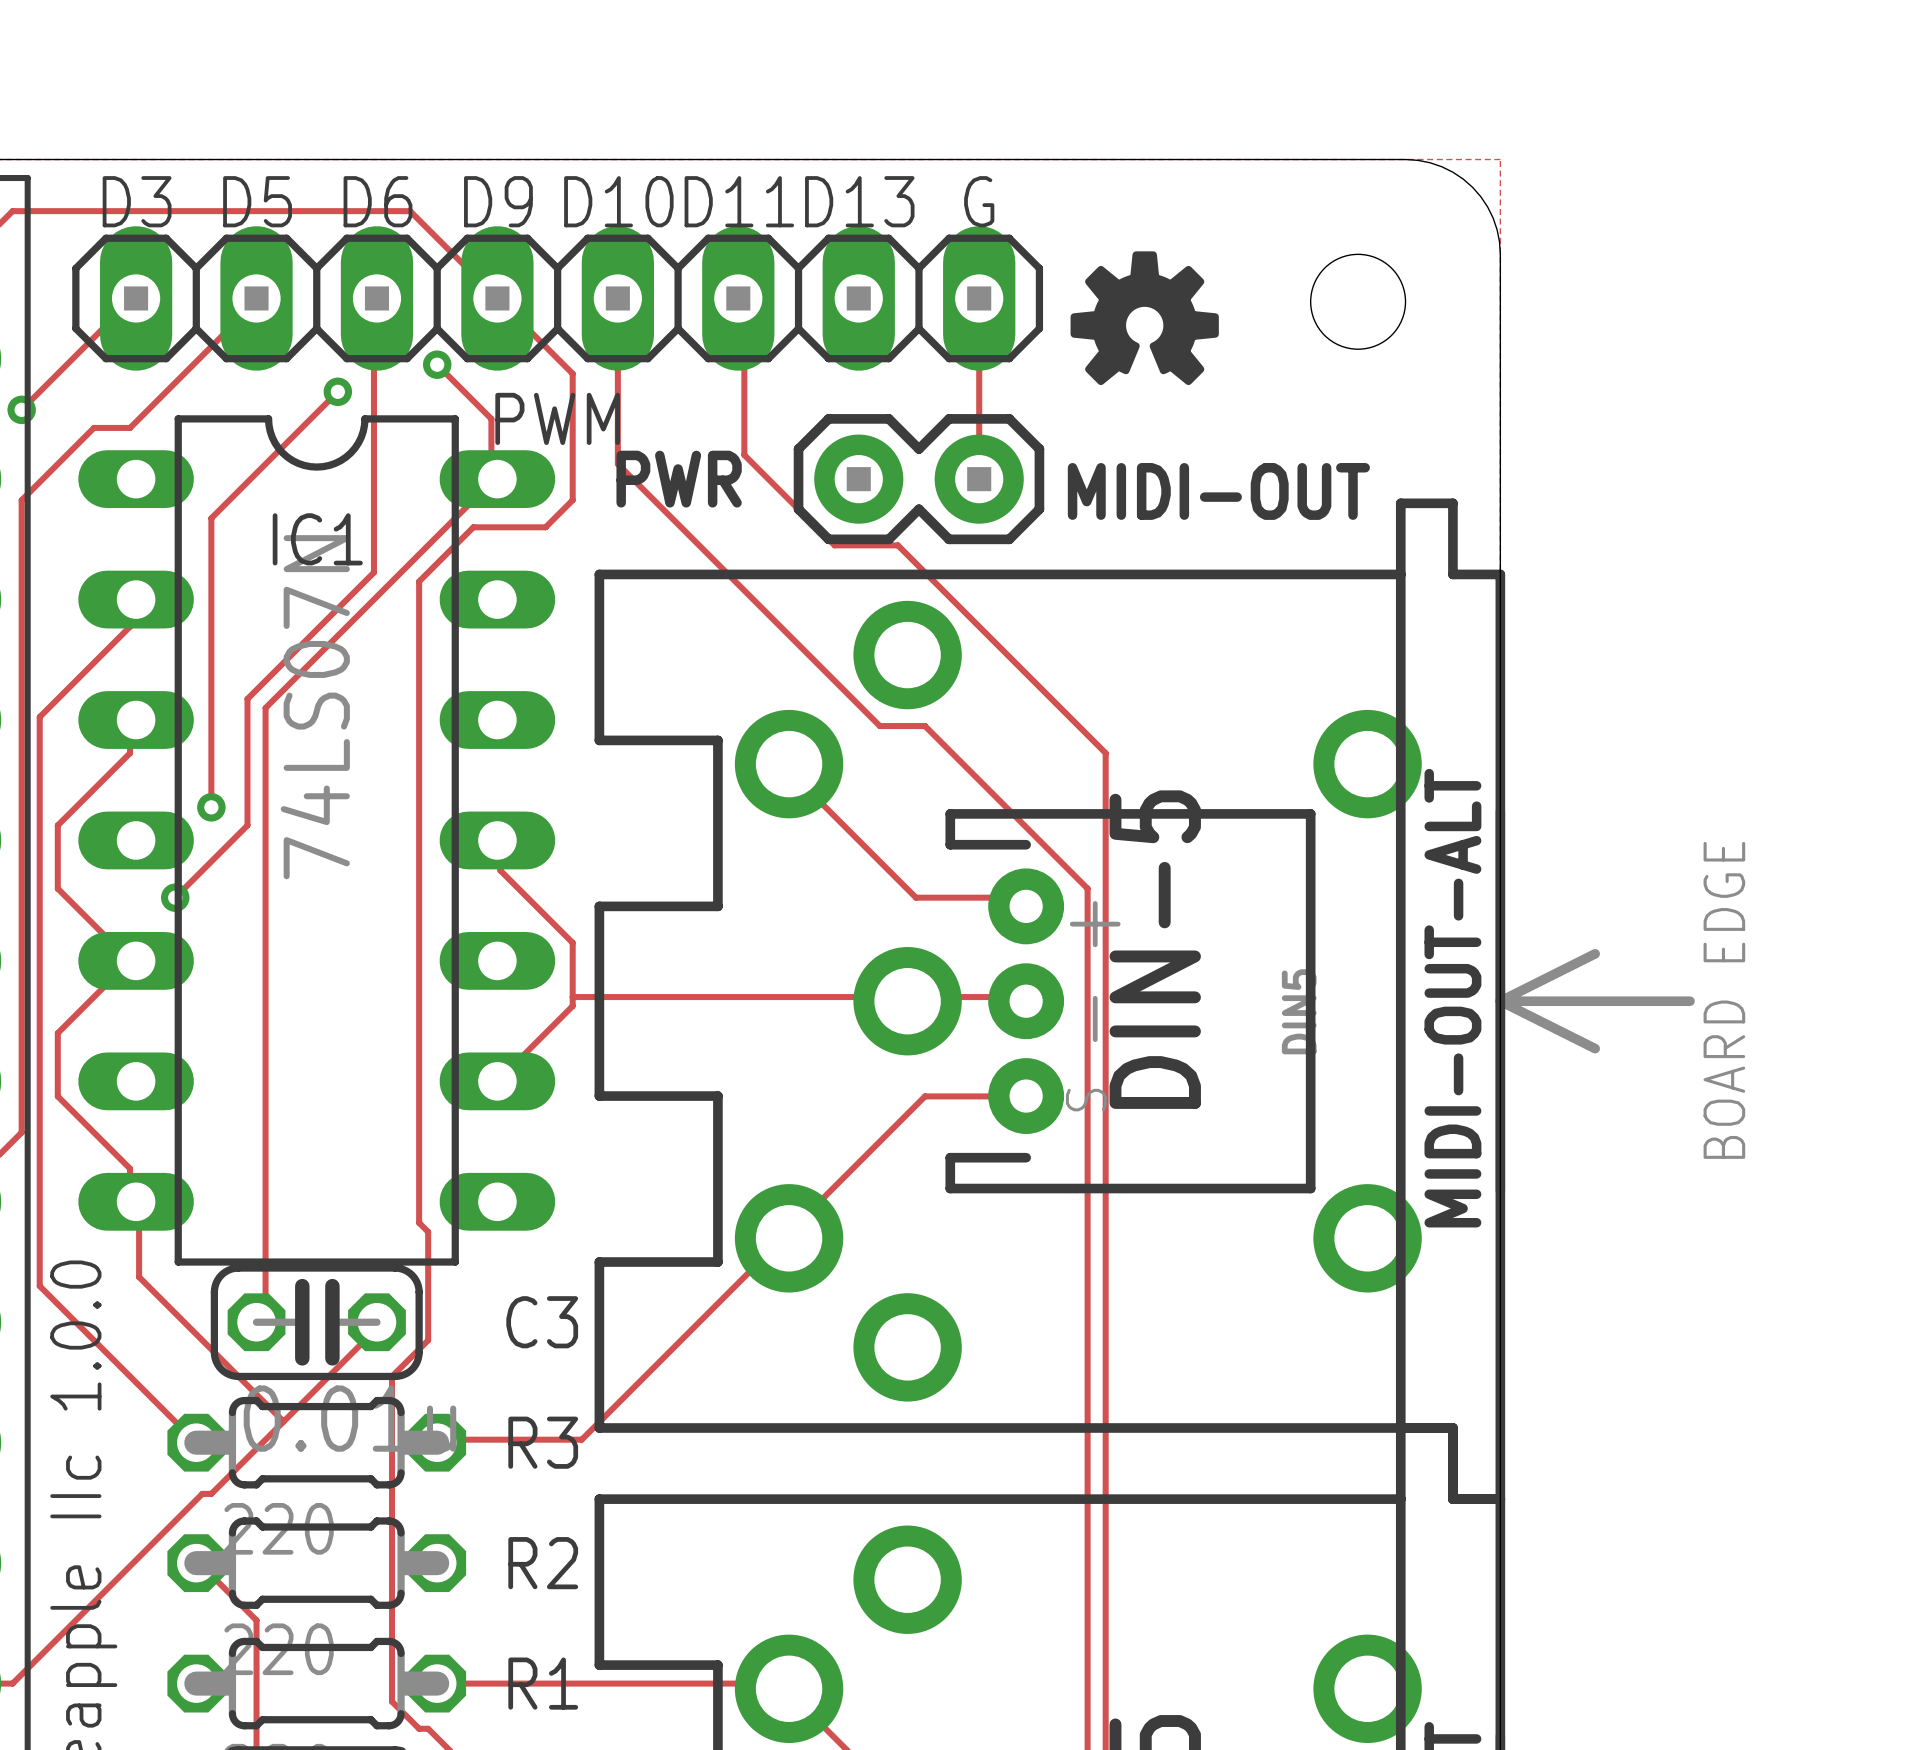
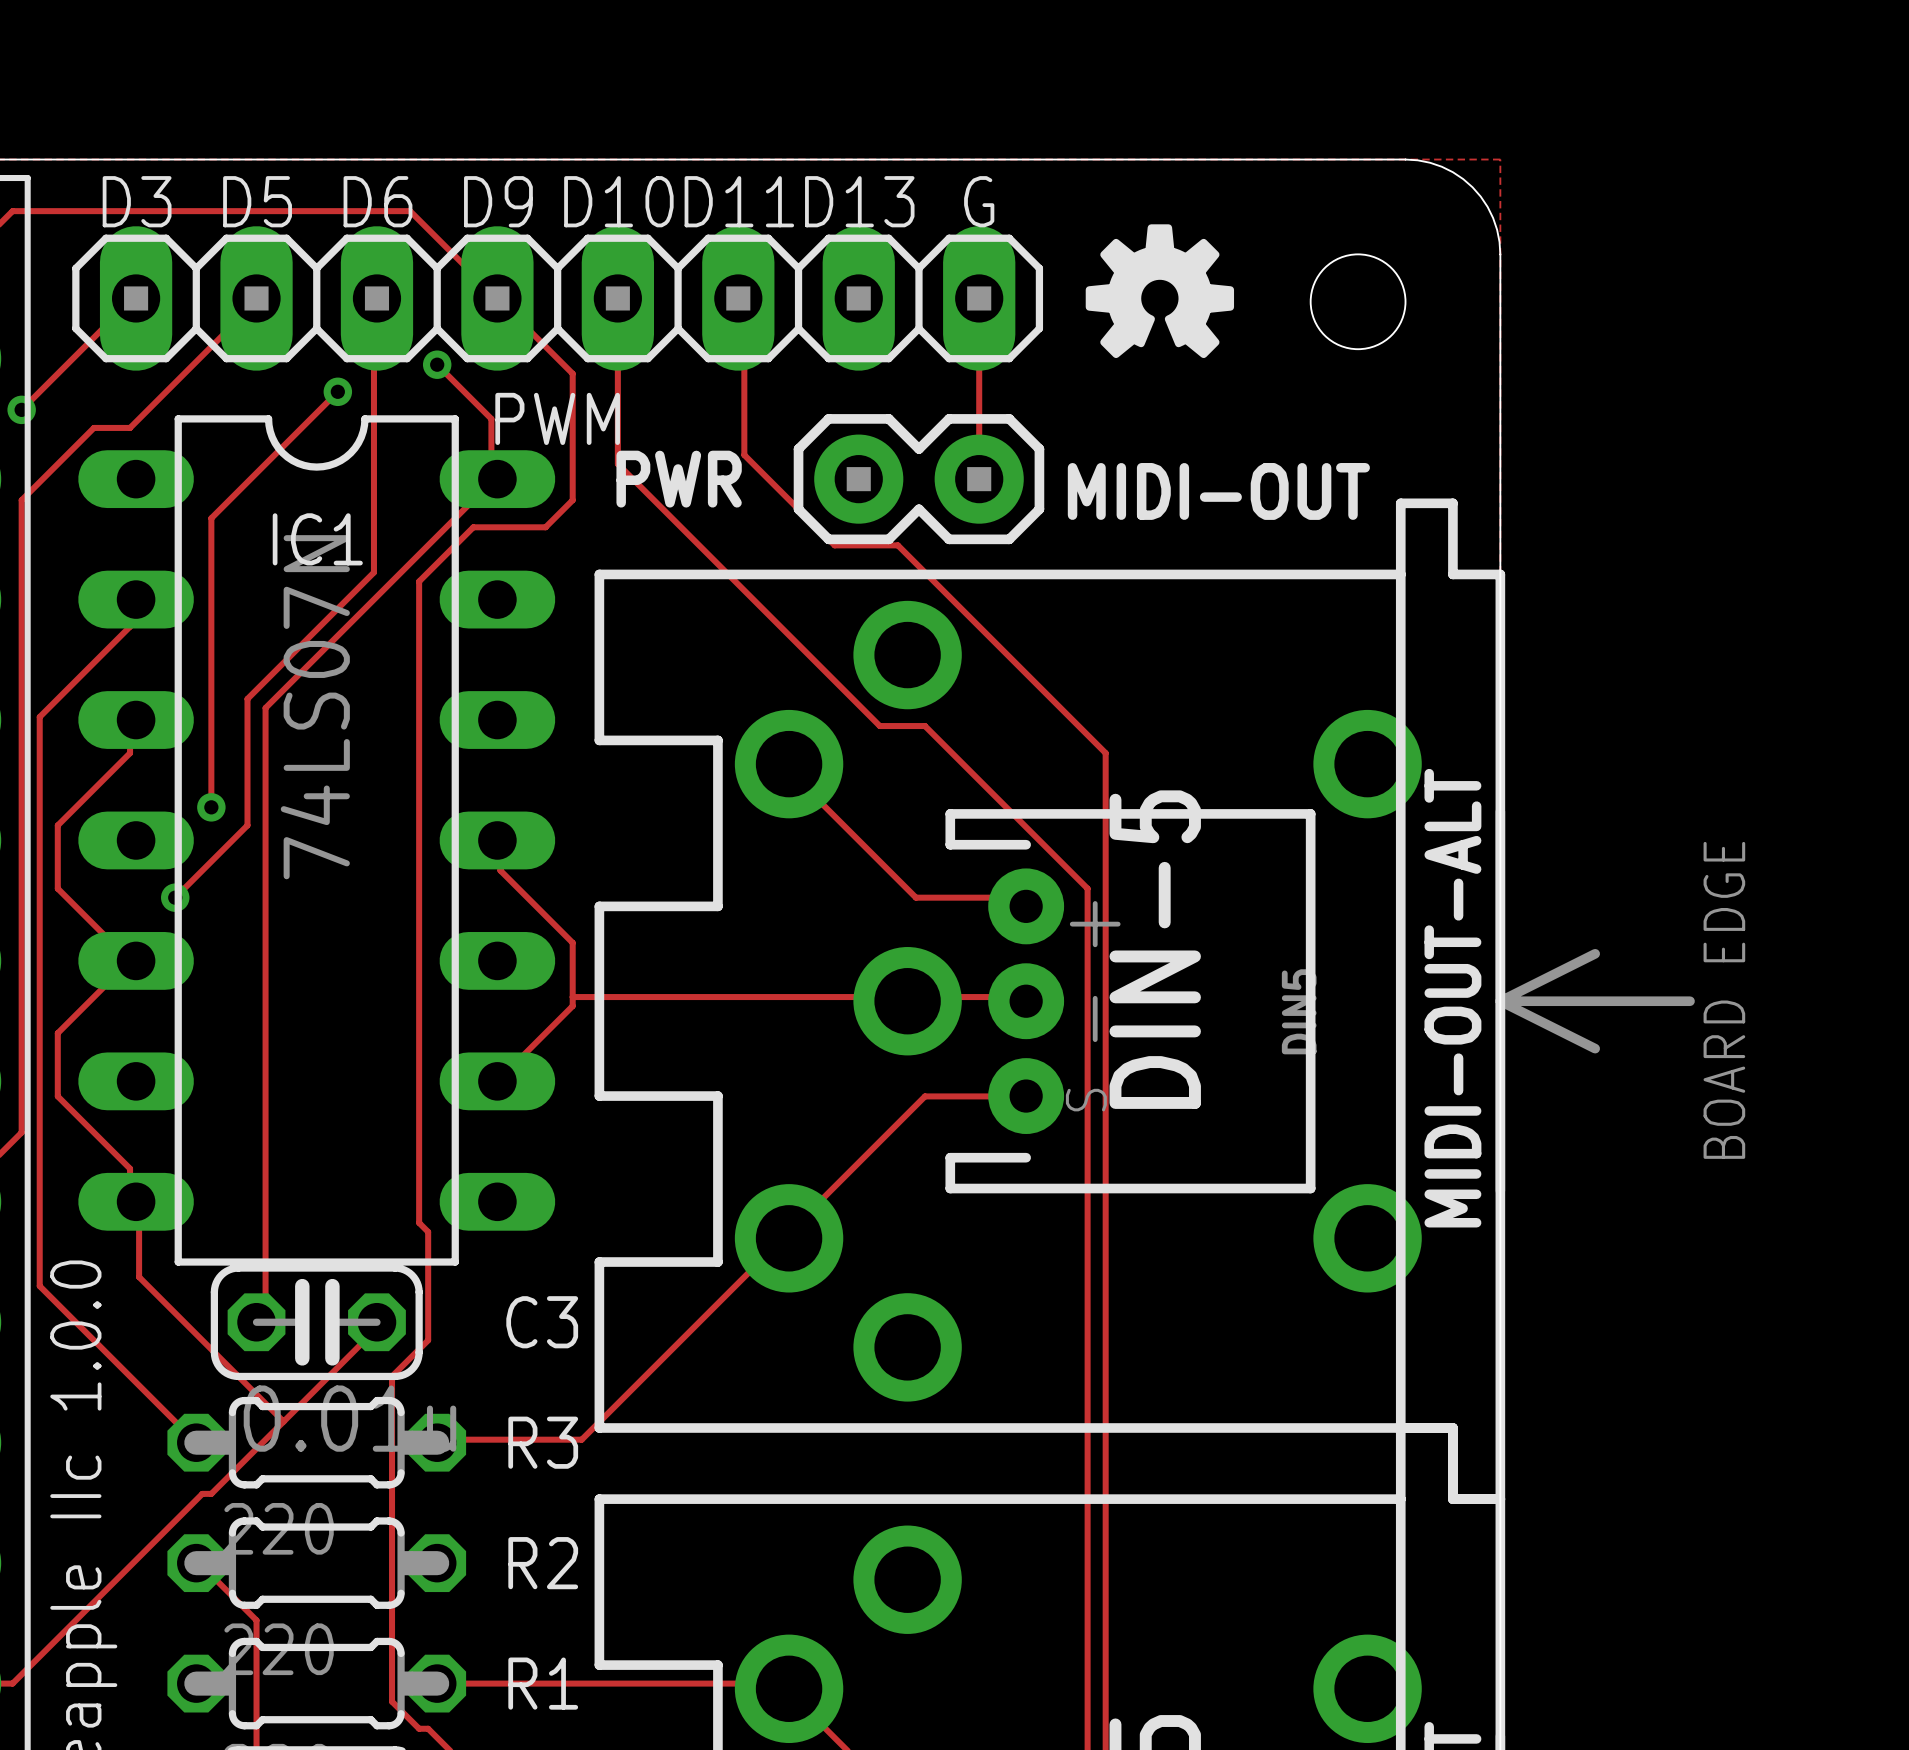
drawing position: (1144, 318) -> (1159, 291)

